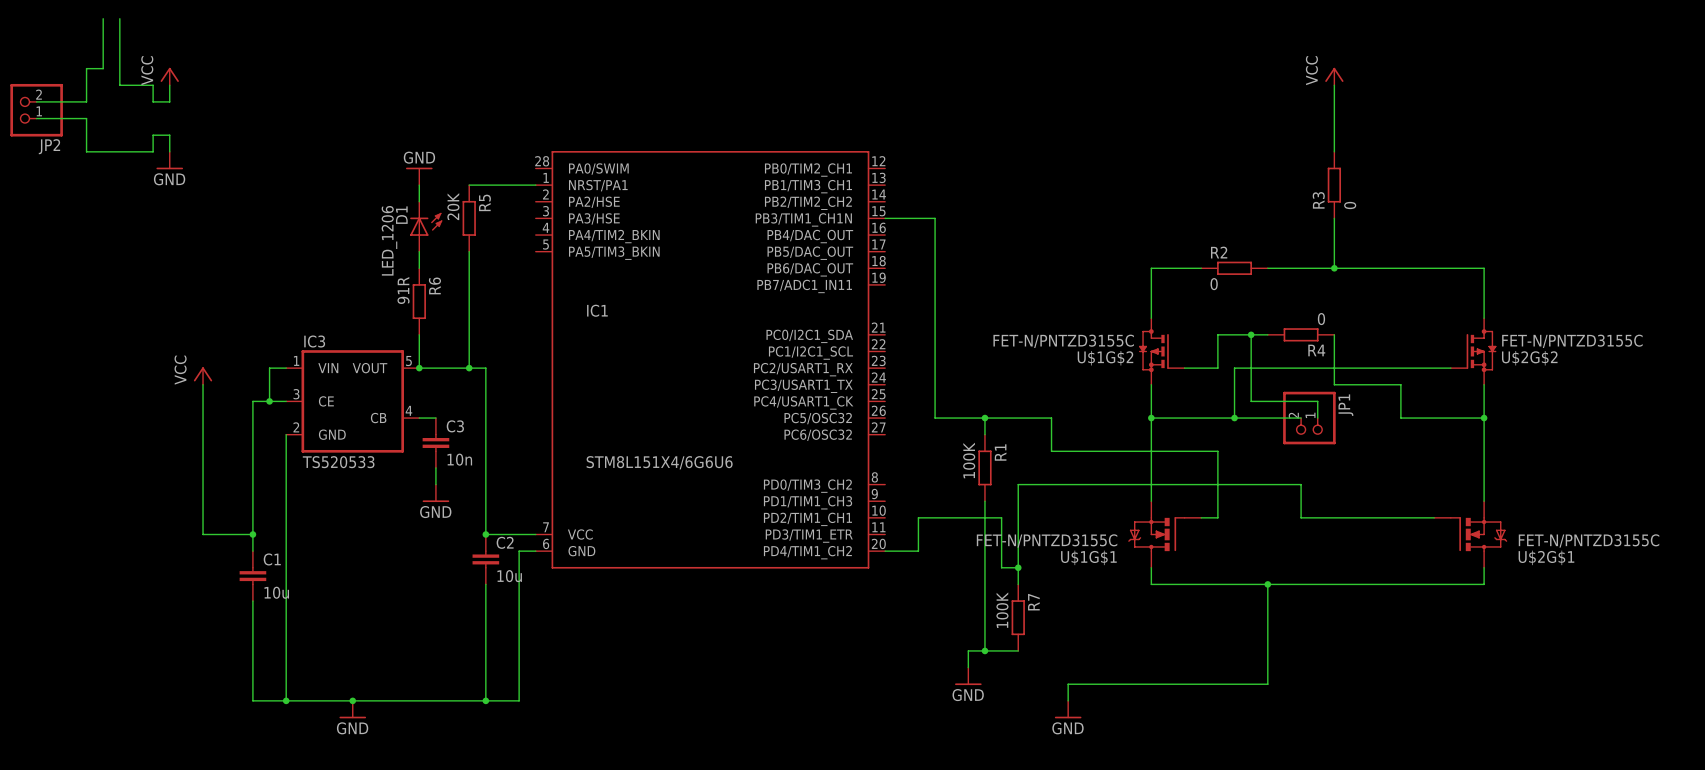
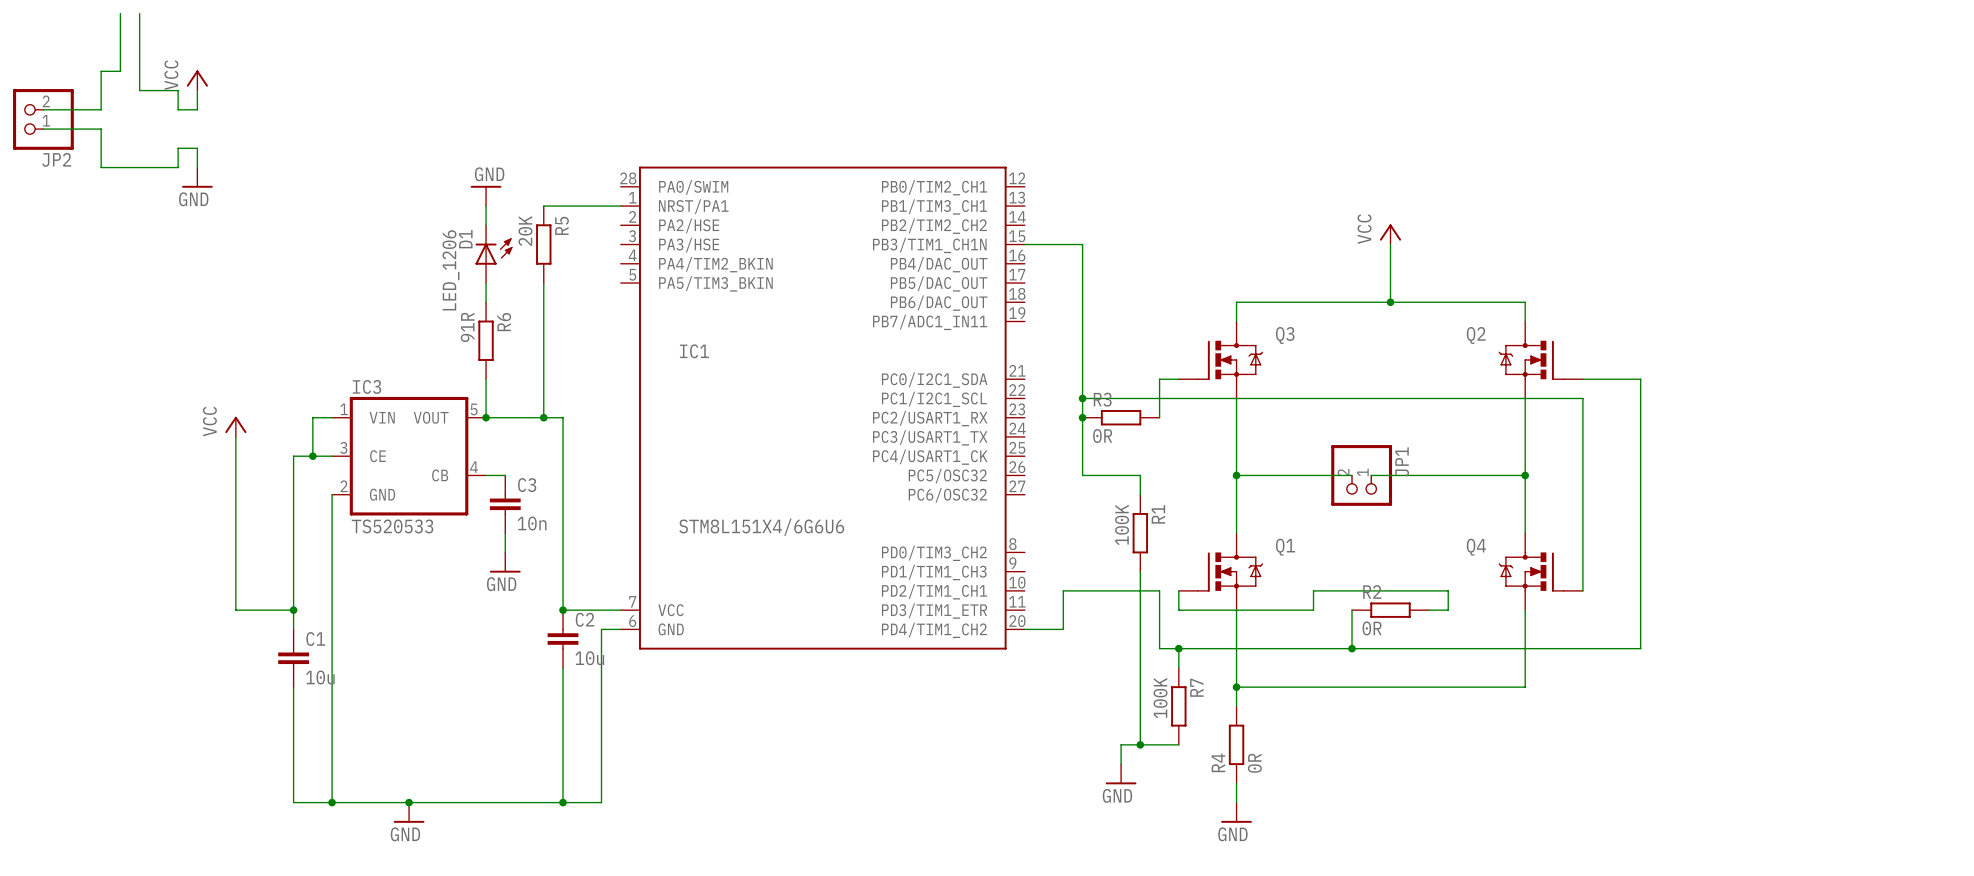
power symbol: VCC (1334, 76) -> none
wire: (1334, 85) (1334, 151) -> none
R3 rotation: 0° (1334, 185) -> 90° clockwise (1121, 417)
R3 position: (1334, 185) -> (1121, 417)
R3 value: 0 (1350, 205) -> 0R (1102, 436)
power symbol: none -> VCC (1390, 234)
wire: none -> (1390, 244) (1390, 302) (1467, 302)
wire: (1334, 218) (1334, 268) -> none
wire: (1151, 268) (1151, 318) -> (1332, 302) (1236, 302) (1236, 321)
junction: none -> (1390, 302)
R2 position: (1234, 268) -> (1390, 610)
wire: (1317, 268) (1484, 268) (1484, 318) -> (1525, 302) (1525, 321)
junction: (1334, 268) -> none
R2 value: 0 (1214, 284) -> 0R (1372, 628)
Q3: none -> (1220, 359)
Q2: none -> (1540, 359)
R4 value: 0 (1321, 319) -> 0R (1254, 763)
wire: none -> (1178, 379) (1159, 379) (1159, 417)
wire: (1251, 334) (1251, 401) (1317, 401) -> (1525, 398) (1525, 456)
junction: (1251, 334) -> none
wire: (1267, 334) (1217, 334) (1217, 368) (1184, 368) -> none
R4 rotation: 0° (1301, 334) -> 90° clockwise (1236, 744)
R4 position: (1301, 334) -> (1236, 744)
wire: (1334, 334) (1334, 384) (1400, 384) (1400, 418) (1484, 418) -> none
wire: none -> (1582, 379) (1640, 379) (1640, 648) (1178, 648)
wire: none -> (1082, 398) (1582, 398) (1582, 590)
junction: none -> (1082, 398)
U$1G$2: FET-N/PNTZD3155C (1161, 351) -> none
U$2G$2: FET-N/PNTZD3155C (1473, 351) -> none
junction: none -> (1082, 417)
wire: (1450, 368) (1234, 368) (1234, 418) -> none
wire: (1151, 384) (1151, 501) -> (1236, 398) (1236, 533)
wire: (1484, 384) (1484, 501) -> none
wire: (984, 418) (1051, 418) (1051, 451) (1217, 451) (1217, 517) -> (1428, 610) (1448, 610) (1448, 590) (1409, 590)
junction: (984, 418) -> none
wire: none -> (1236, 475) (1332, 475)
junction: none -> (1236, 475)
junction: (1151, 418) -> none
wire: (1167, 418) (1184, 418) -> none
junction: (1234, 418) -> none
wire: none -> (1505, 475) (1525, 475) (1525, 533)
JP1 position: (1309, 418) -> (1361, 475)
junction: none -> (1525, 475)
junction: (1484, 418) -> none
Q1: none -> (1220, 571)
Q4: none -> (1540, 571)
wire: (1018, 517) (1018, 484) (1301, 484) (1301, 517) (1434, 517) -> none
wire: (1018, 534) (1018, 567) -> (1178, 610) (1313, 610) (1313, 590) (1390, 590)
wire: none -> (1236, 610) (1236, 706)
U$1G$1: FET-N/PNTZD3155C (1164, 534) -> none
wire: none -> (1352, 610) (1352, 648)
wire: none -> (1525, 610) (1525, 687) (1236, 687)
U$2G$1: FET-N/PNTZD3155C (1470, 534) -> none
wire: (1151, 567) (1151, 584) (1484, 584) (1484, 567) -> none
junction: none -> (1352, 648)
wire: (1267, 584) (1267, 684) (1068, 684) -> none
junction: (1267, 584) -> none
junction: none -> (1236, 687)

